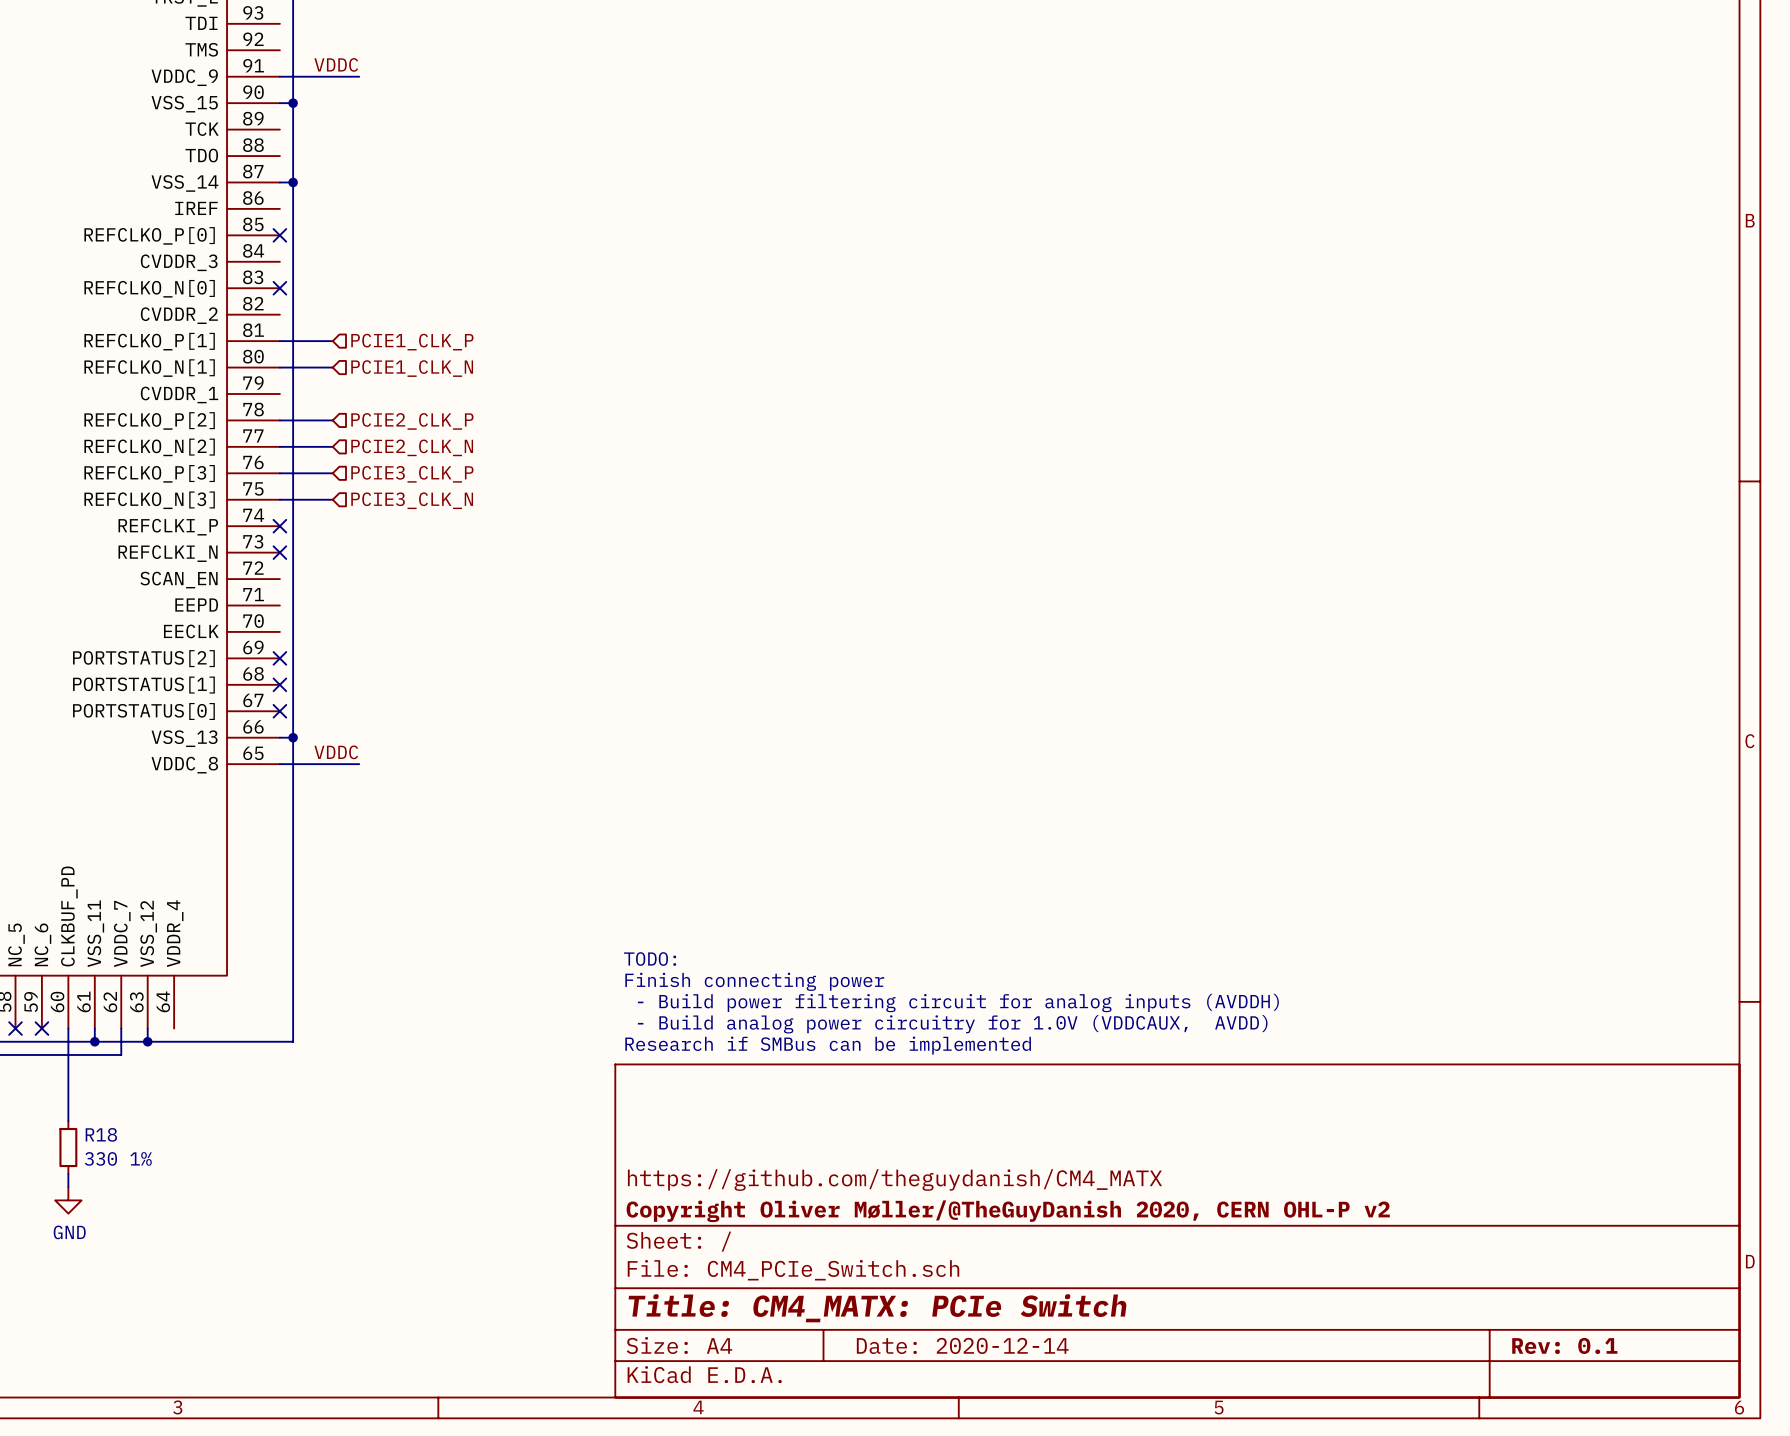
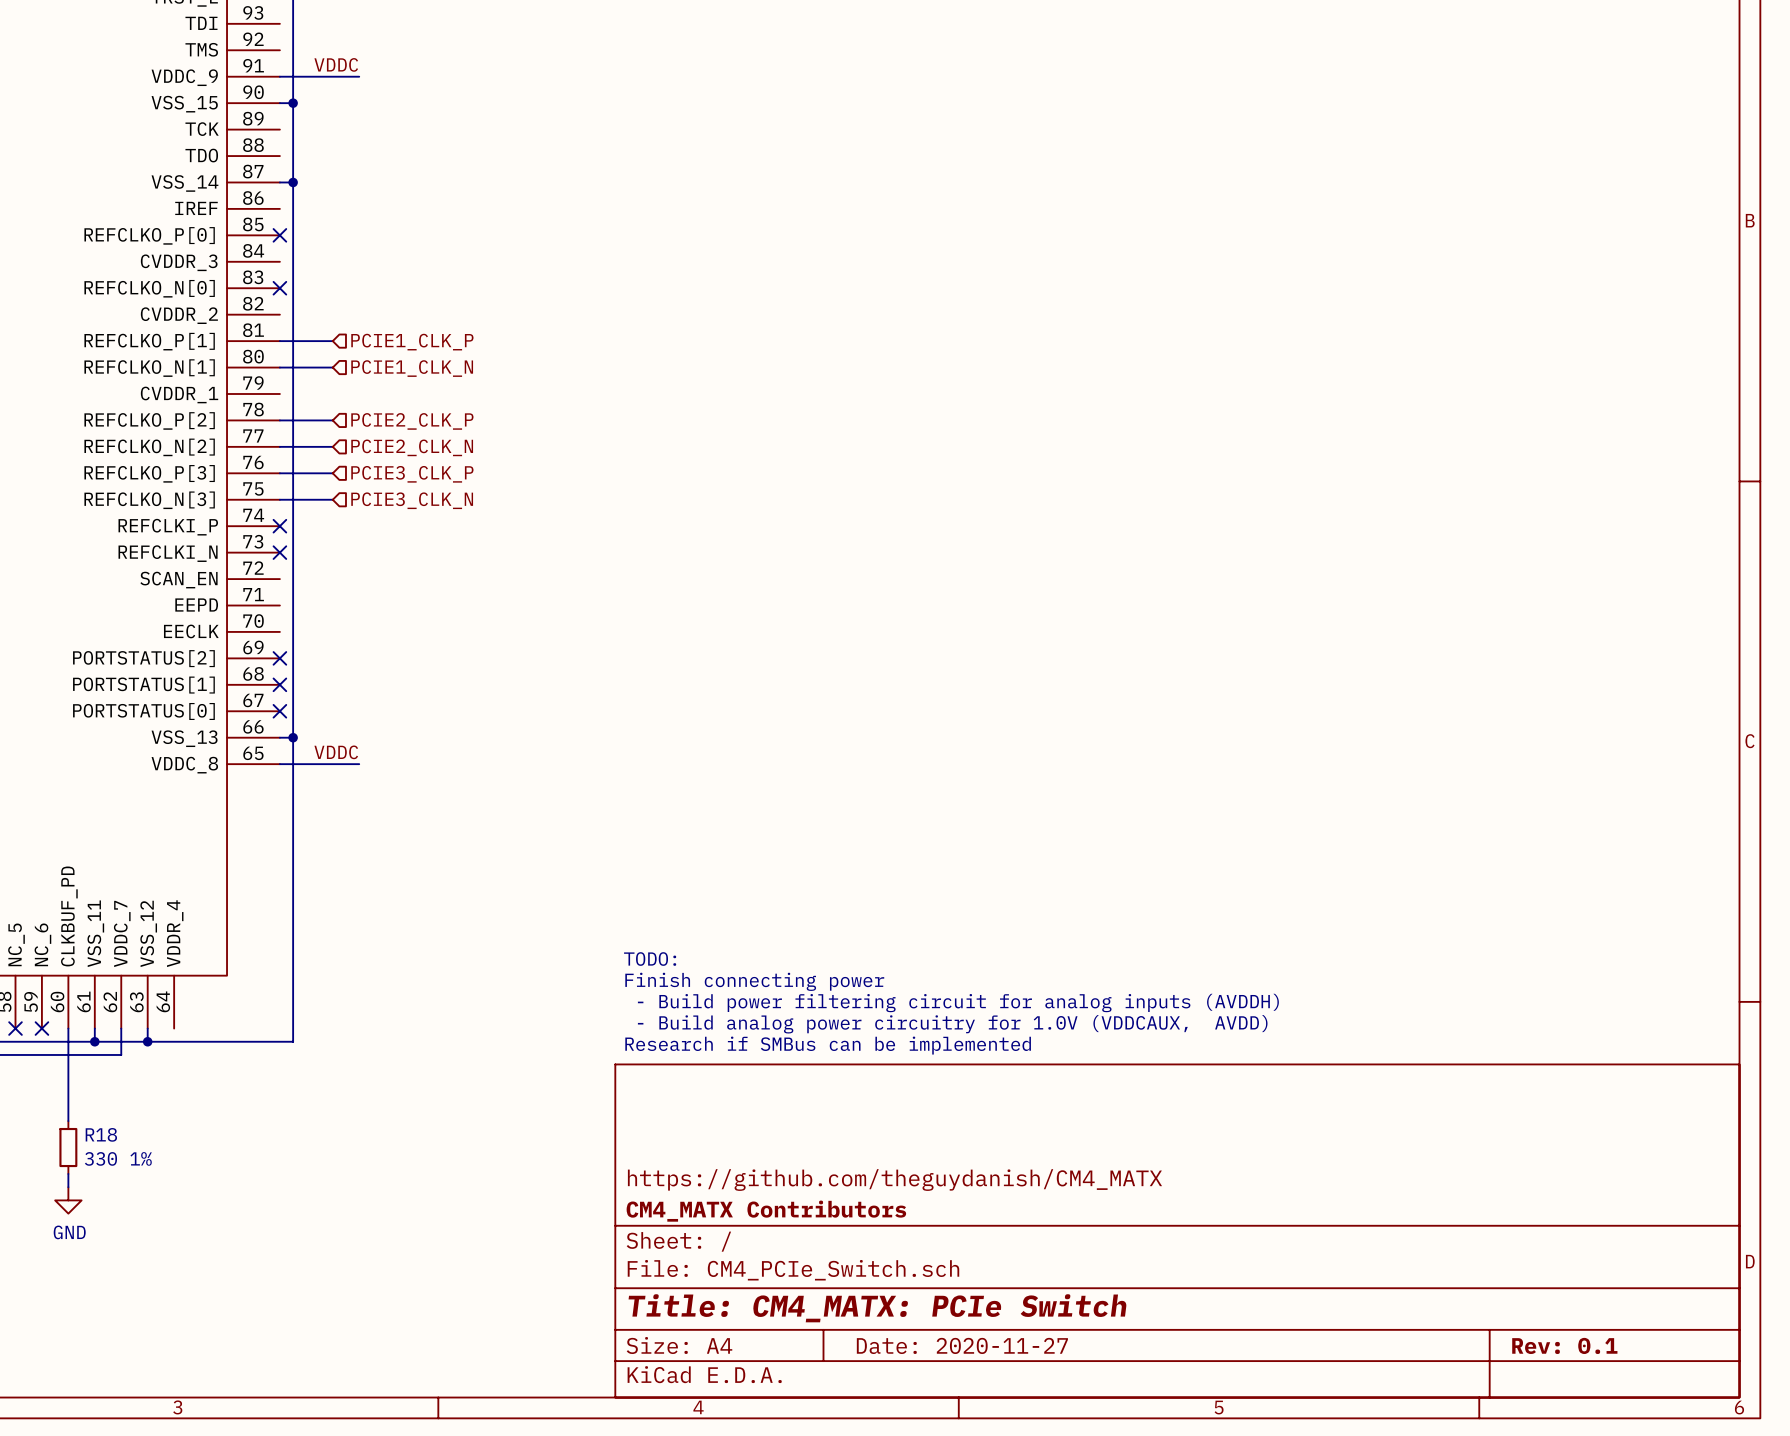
title block: Copyright Oliver Møller/@TheGuyDanish 2020, CERN OHL-P v2 (1008, 1211) -> CM4_MATX Contributors (766, 1211)
title block: Date: 2020-12-14 (962, 1345) -> Date: 2020-11-27 (962, 1345)

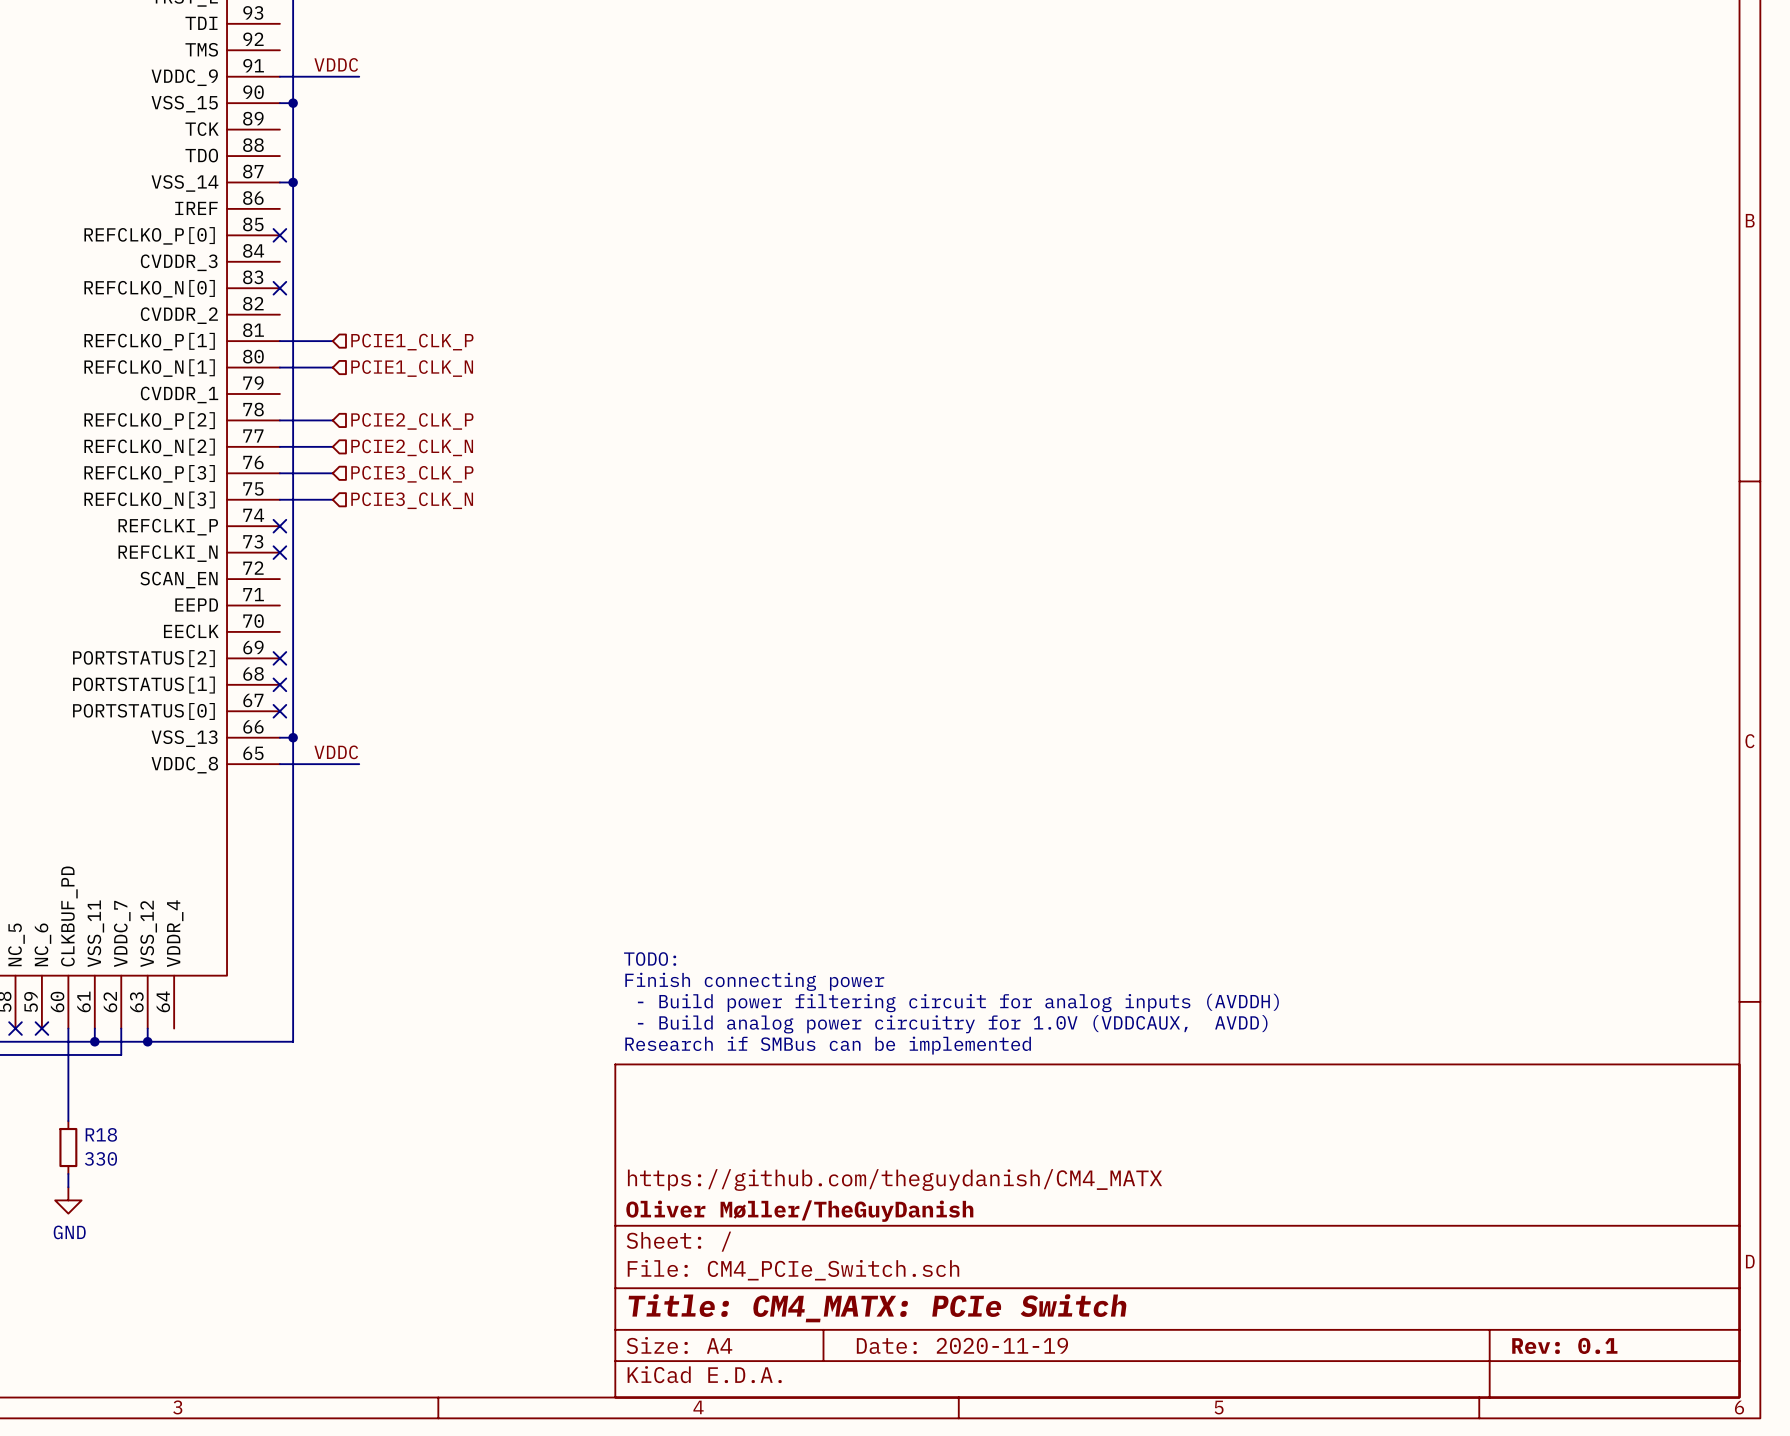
R18 value: 330 1% (118, 1158) -> 330 (100, 1158)
title block: CM4_MATX Contributors (766, 1211) -> Oliver Møller/TheGuyDanish (799, 1211)
title block: Date: 2020-11-27 (962, 1345) -> Date: 2020-11-19 (962, 1345)

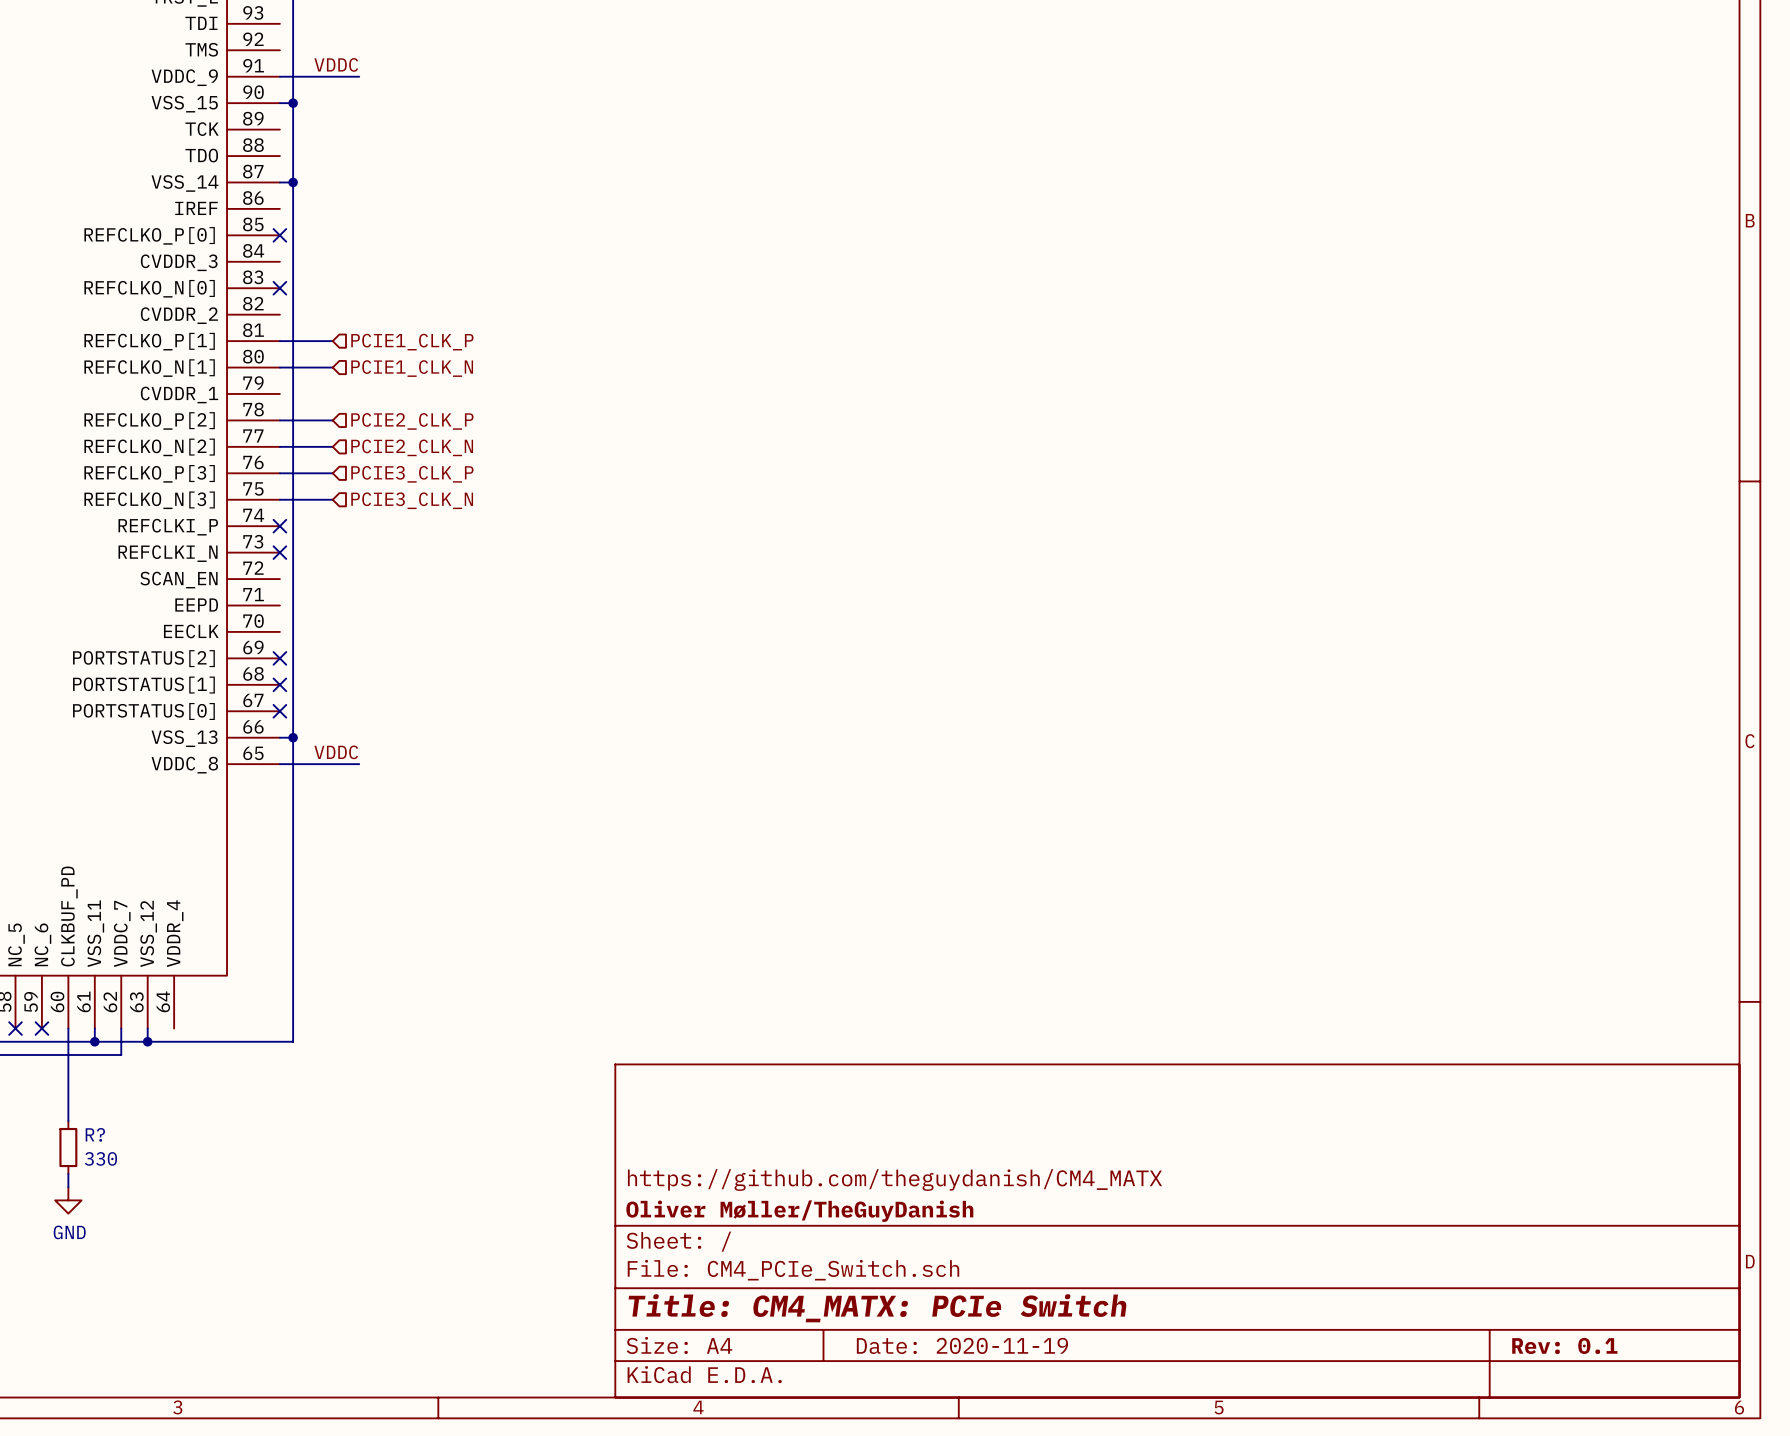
text: TODO: (650, 959) -> none
text: Finish connecting power (754, 981) -> none
text: - Build power filtering circuit for analog inputs (AVDDH) (958, 1003) -> none
text: - Build analog power circuitry for 1.0V (VDDCAUX, AVDD) (952, 1024) -> none
text: Research if SMBus can be implemented (828, 1045) -> none
R18 name: R18 (101, 1134) -> R? (95, 1134)

